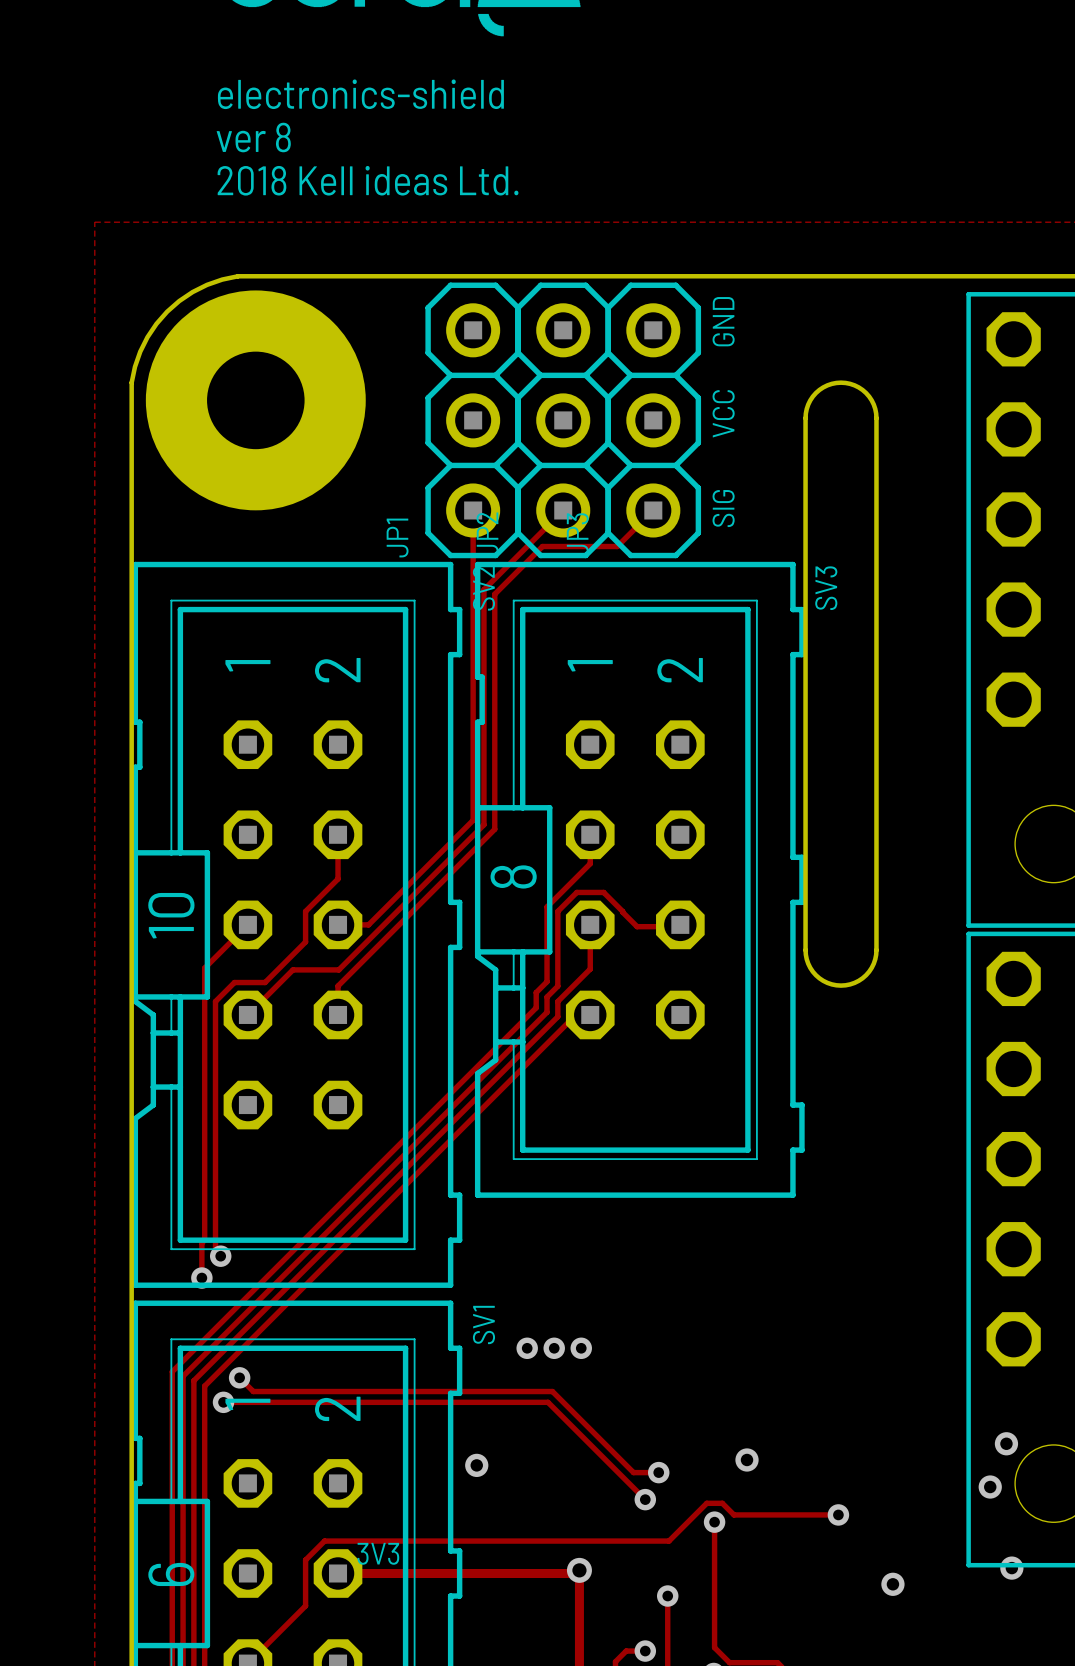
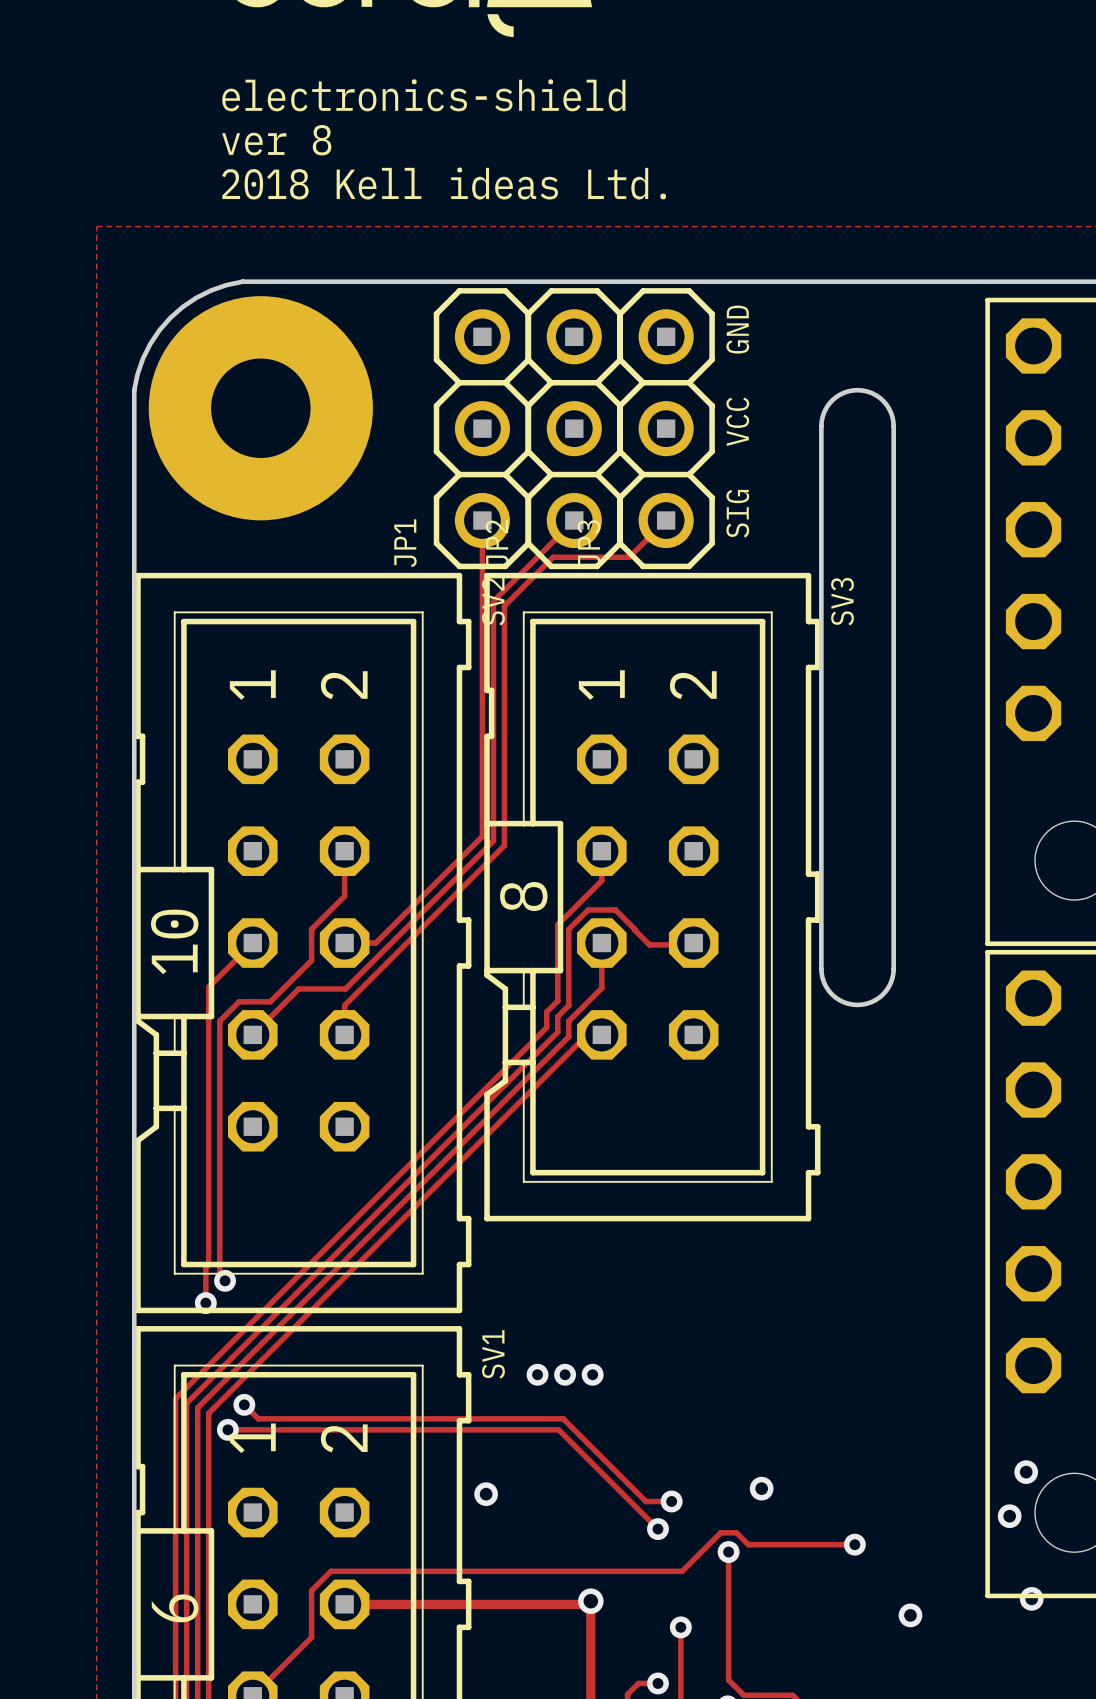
text: 3V3 (378, 1553) -> none

